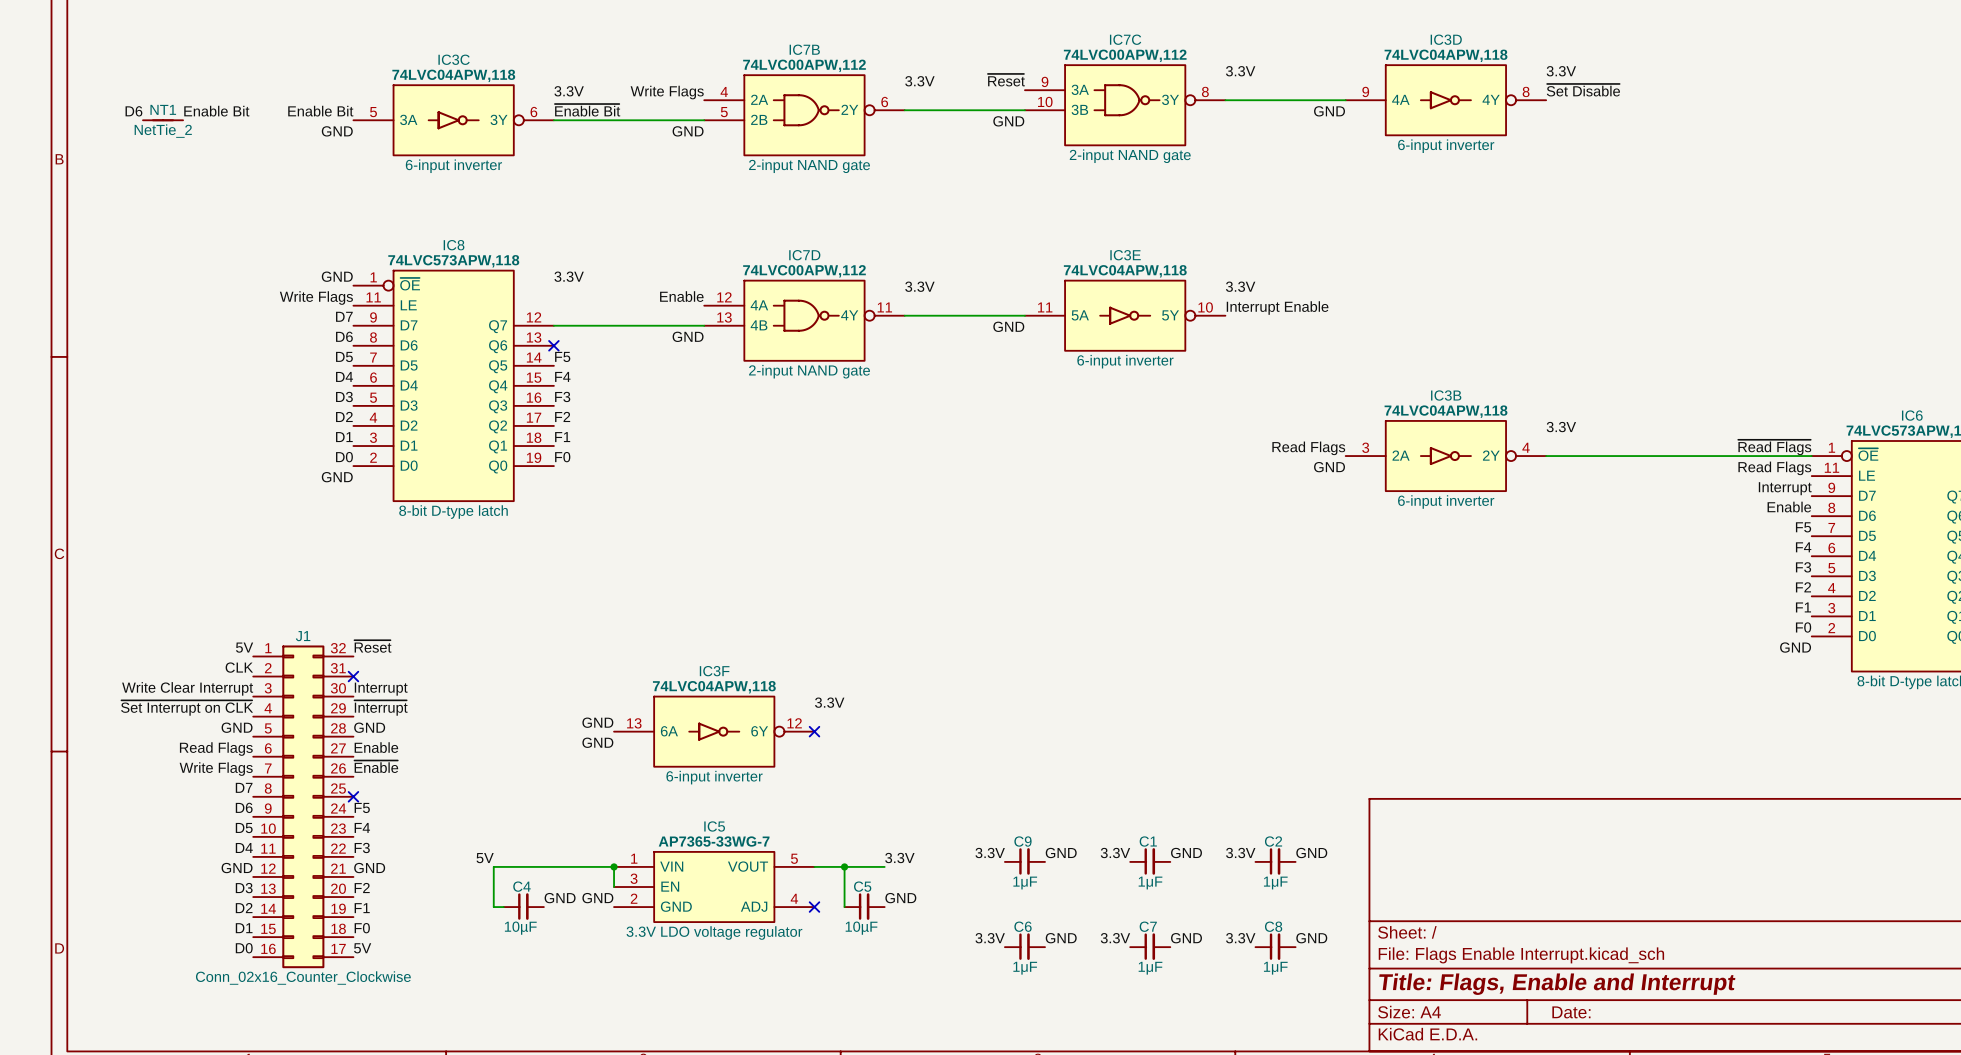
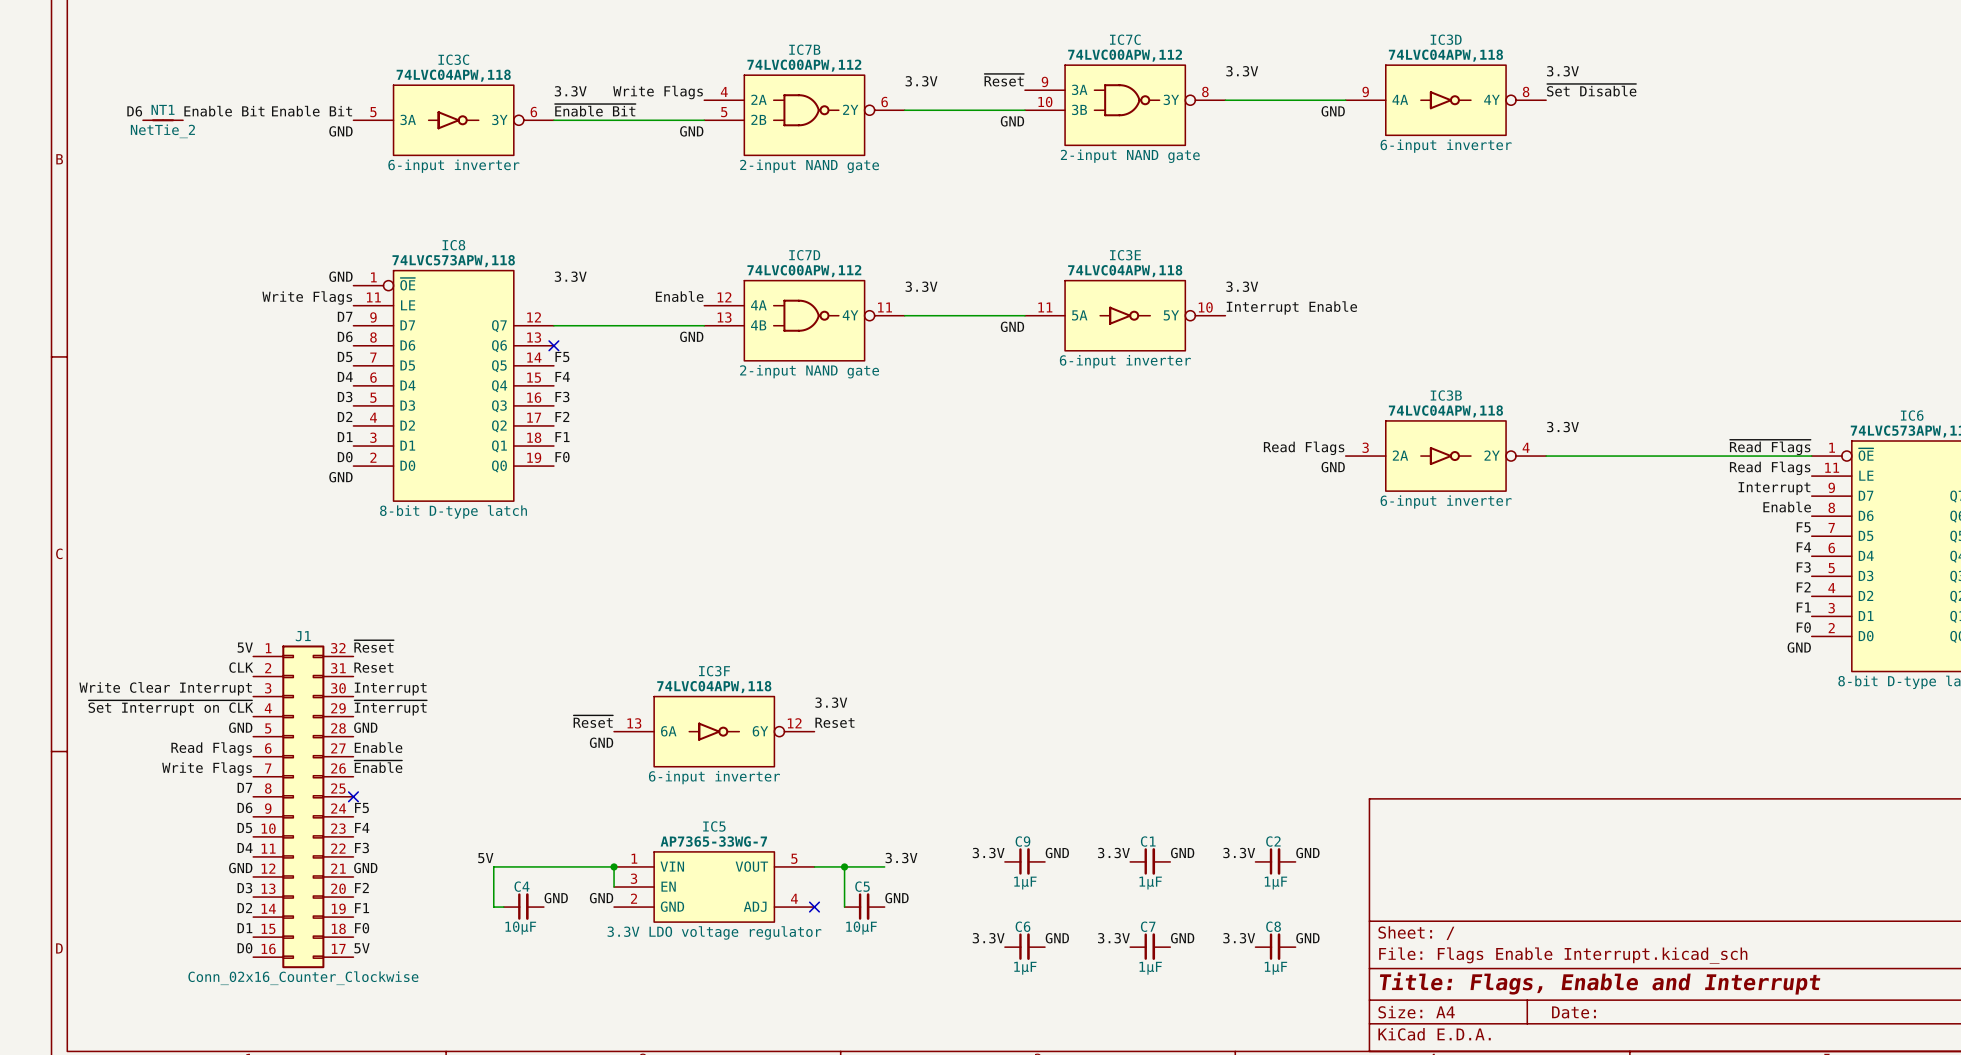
label: none -> Reset (373, 667)
no-connect mark: (353, 676) -> none
label: GND (597, 722) -> ~{Reset} (593, 721)
label: none -> Reset (834, 722)
no-connect mark: (814, 731) -> none

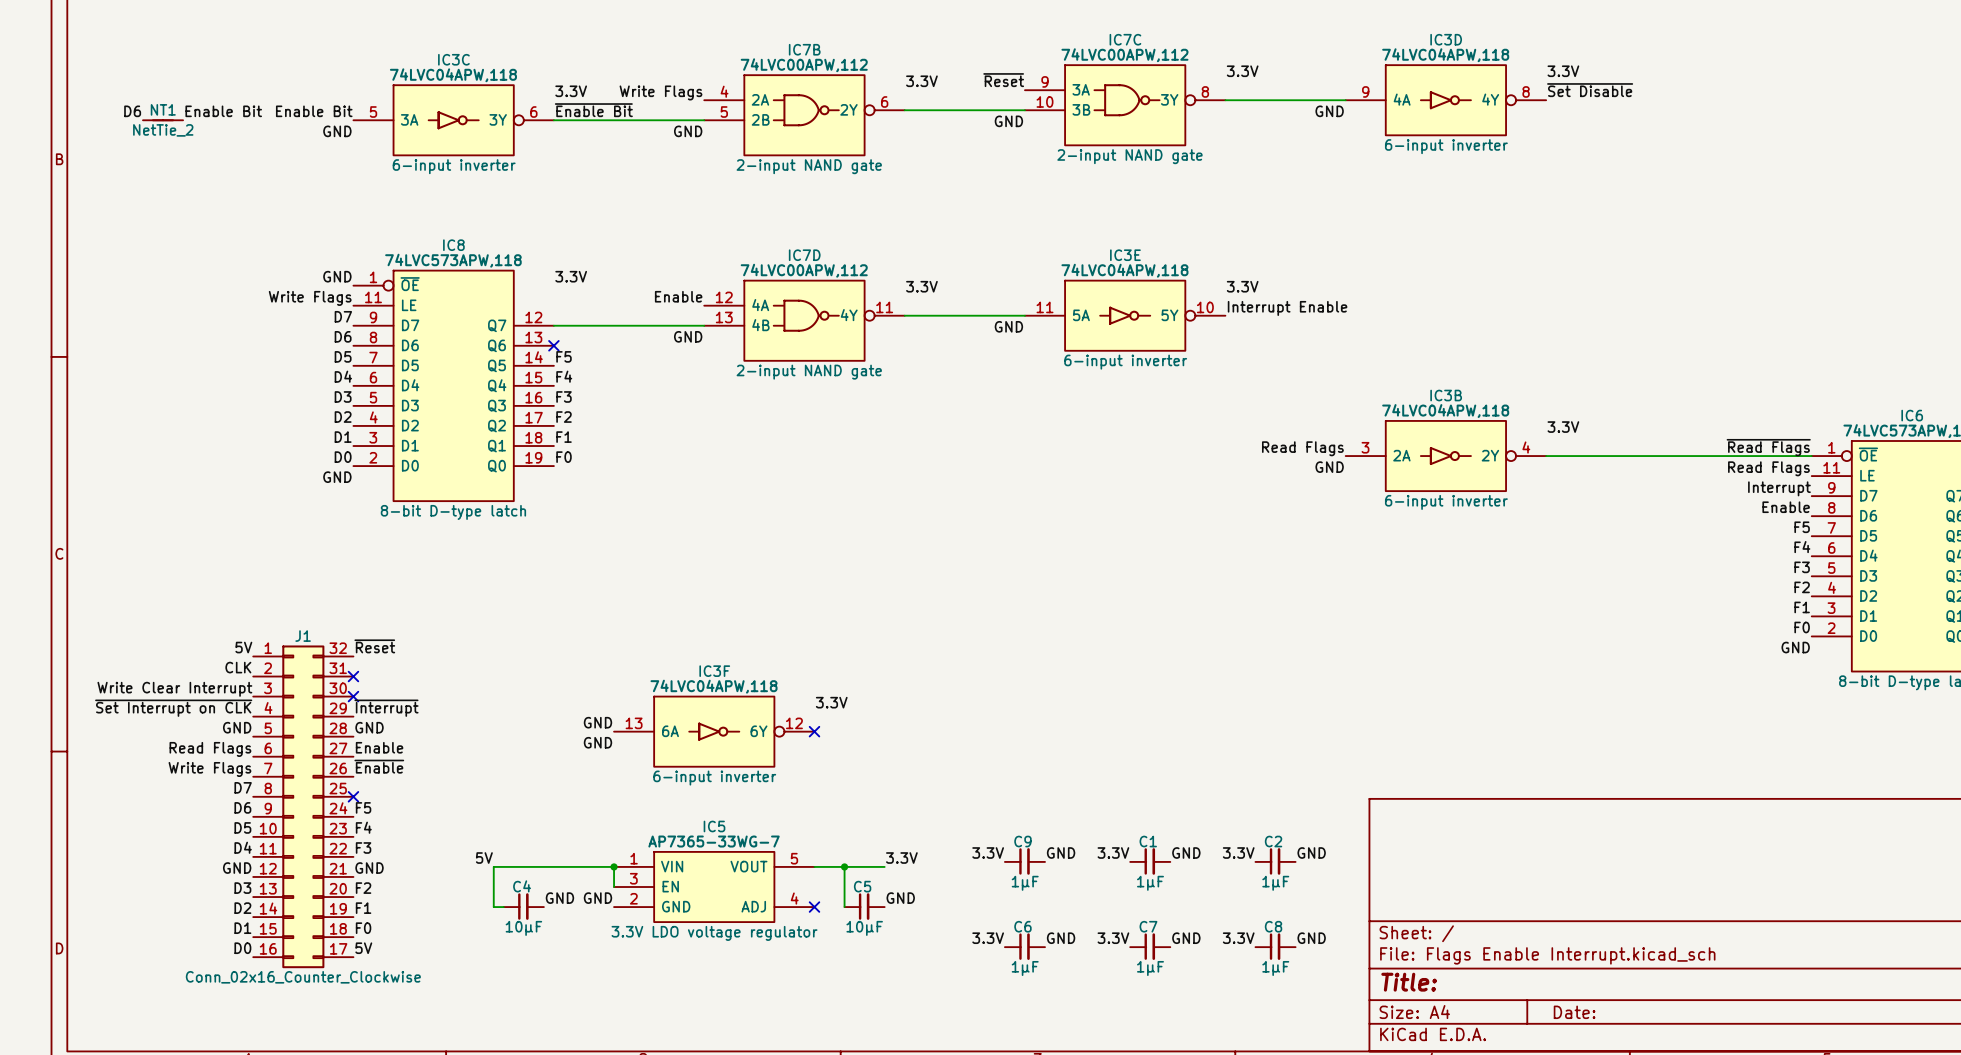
label: Reset (373, 667) -> none
no-connect mark: none -> (353, 676)
label: Interrupt (390, 689) -> none
no-connect mark: none -> (353, 696)
label: ~{Reset} (593, 721) -> GND (597, 722)
label: Reset (834, 722) -> none
no-connect mark: none -> (814, 731)
title block: Title: Flags, Enable and Interrupt (1600, 983) -> Title: (1409, 982)

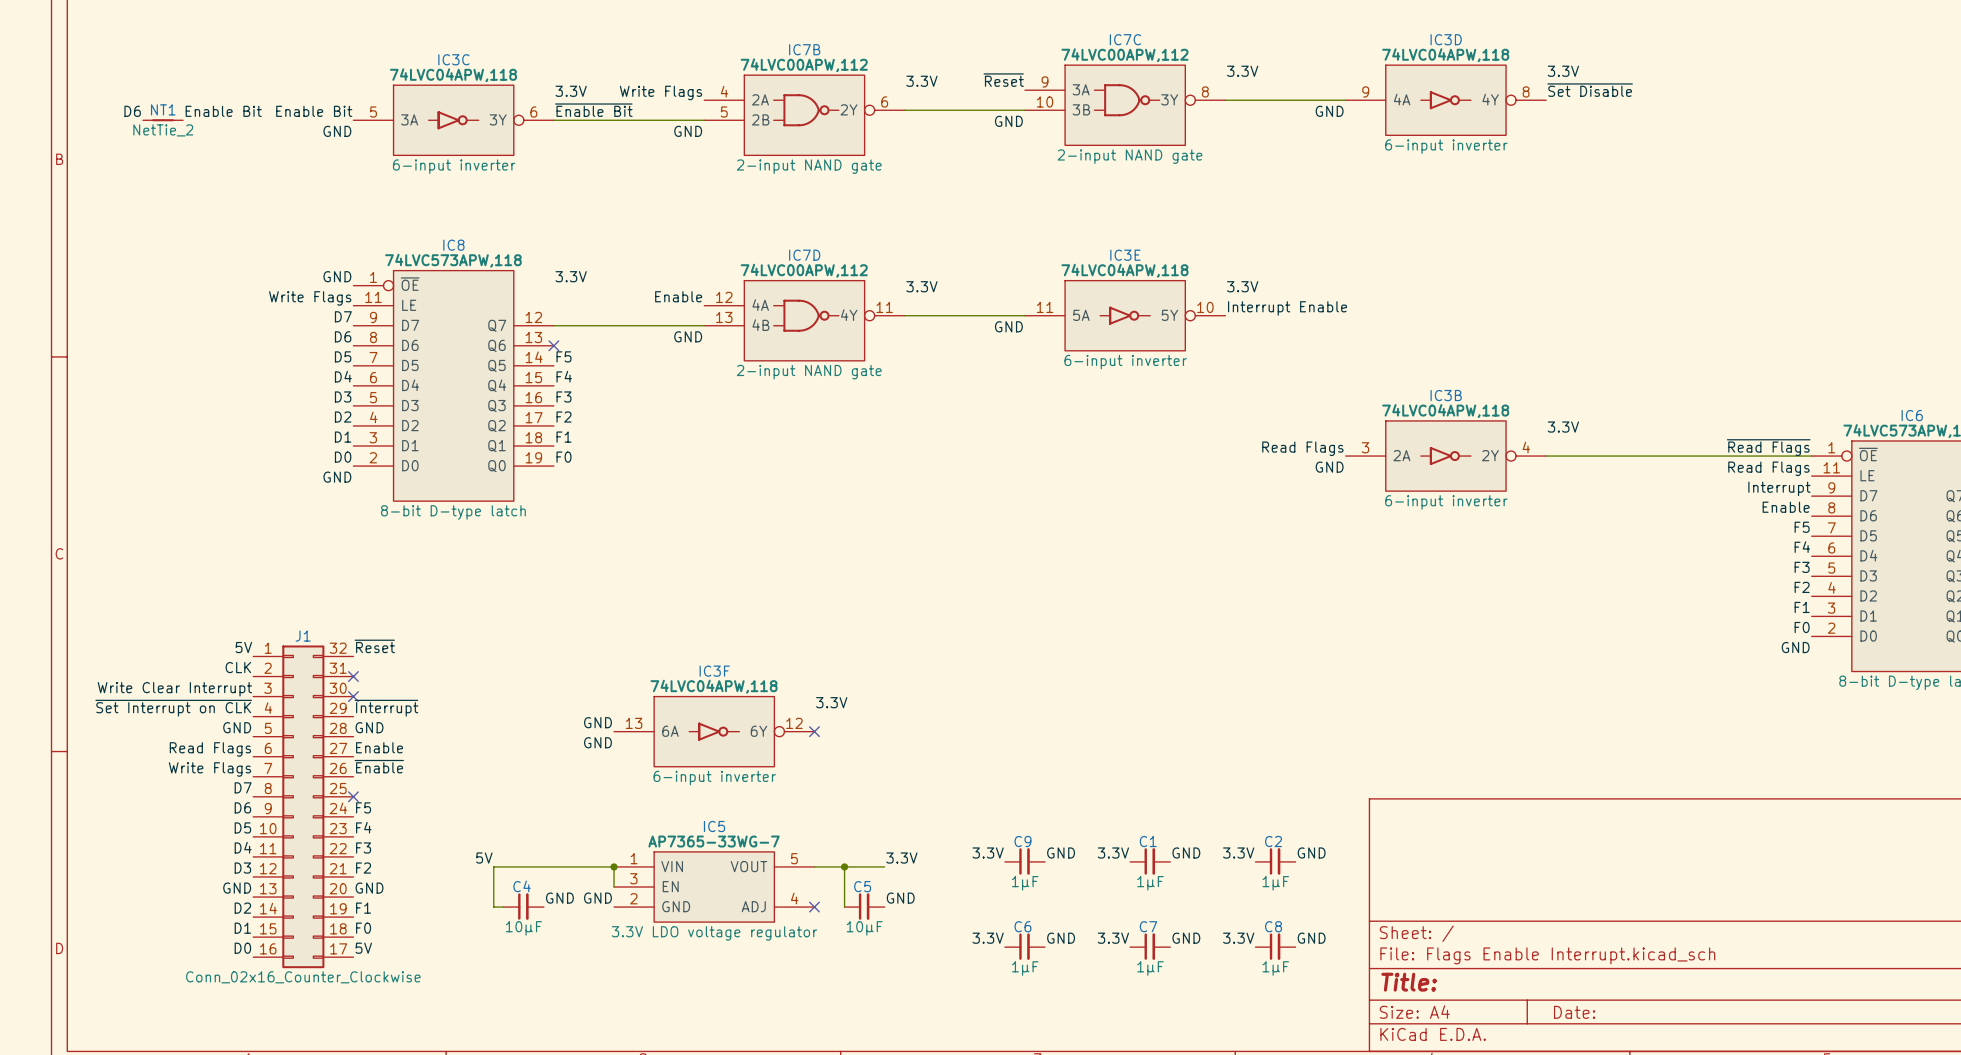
label: GND (237, 868) -> D3 (242, 868)
label: GND (369, 868) -> F2 (363, 868)
label: D3 (242, 888) -> GND (237, 888)
label: F2 (363, 888) -> GND (369, 888)

